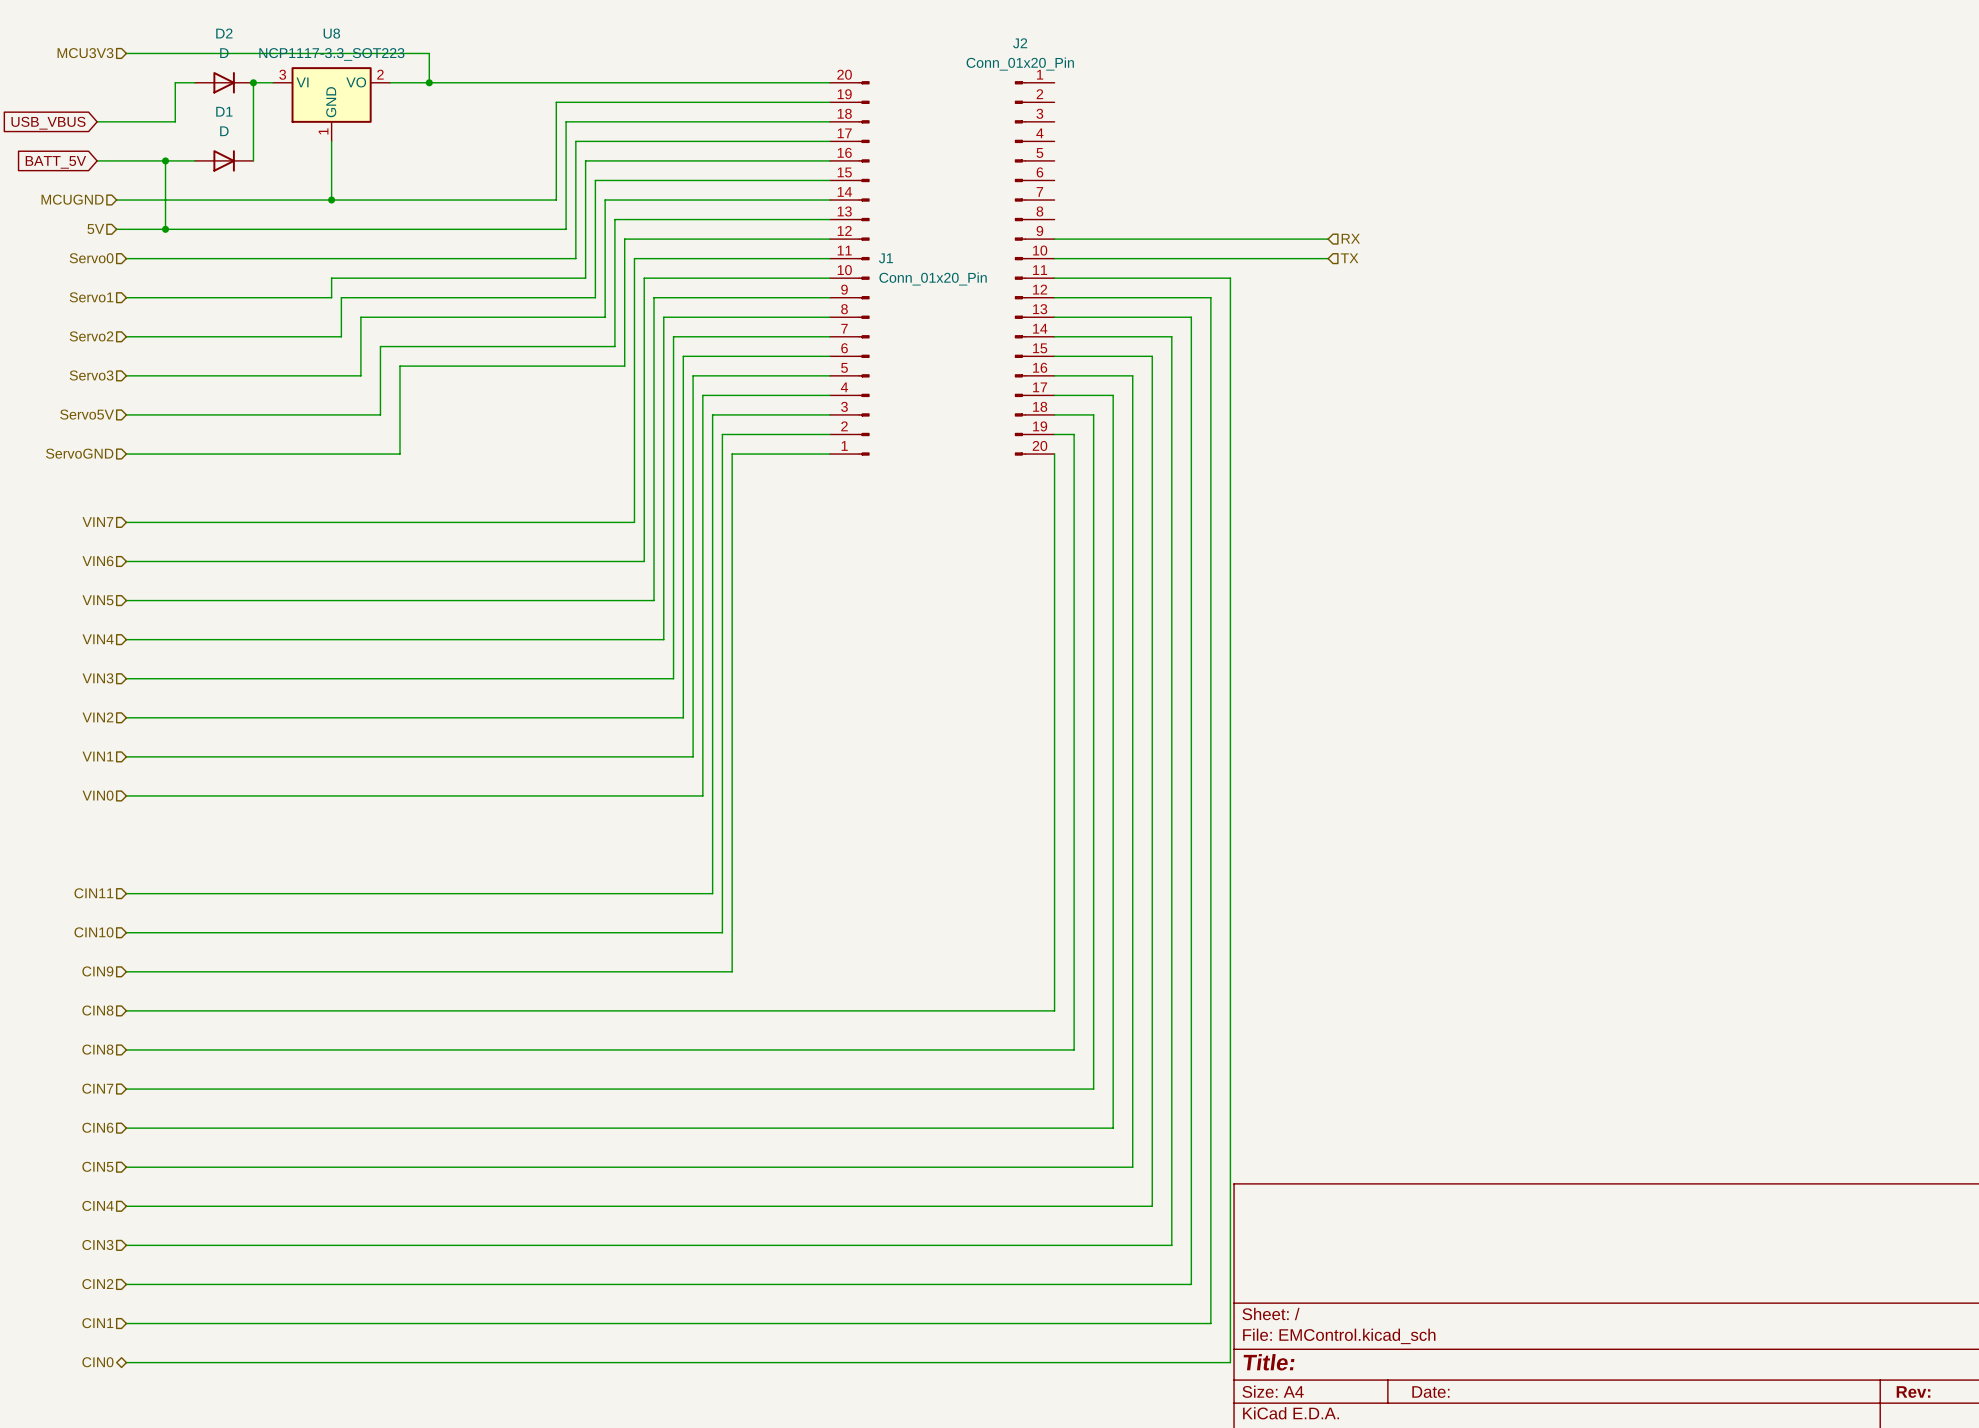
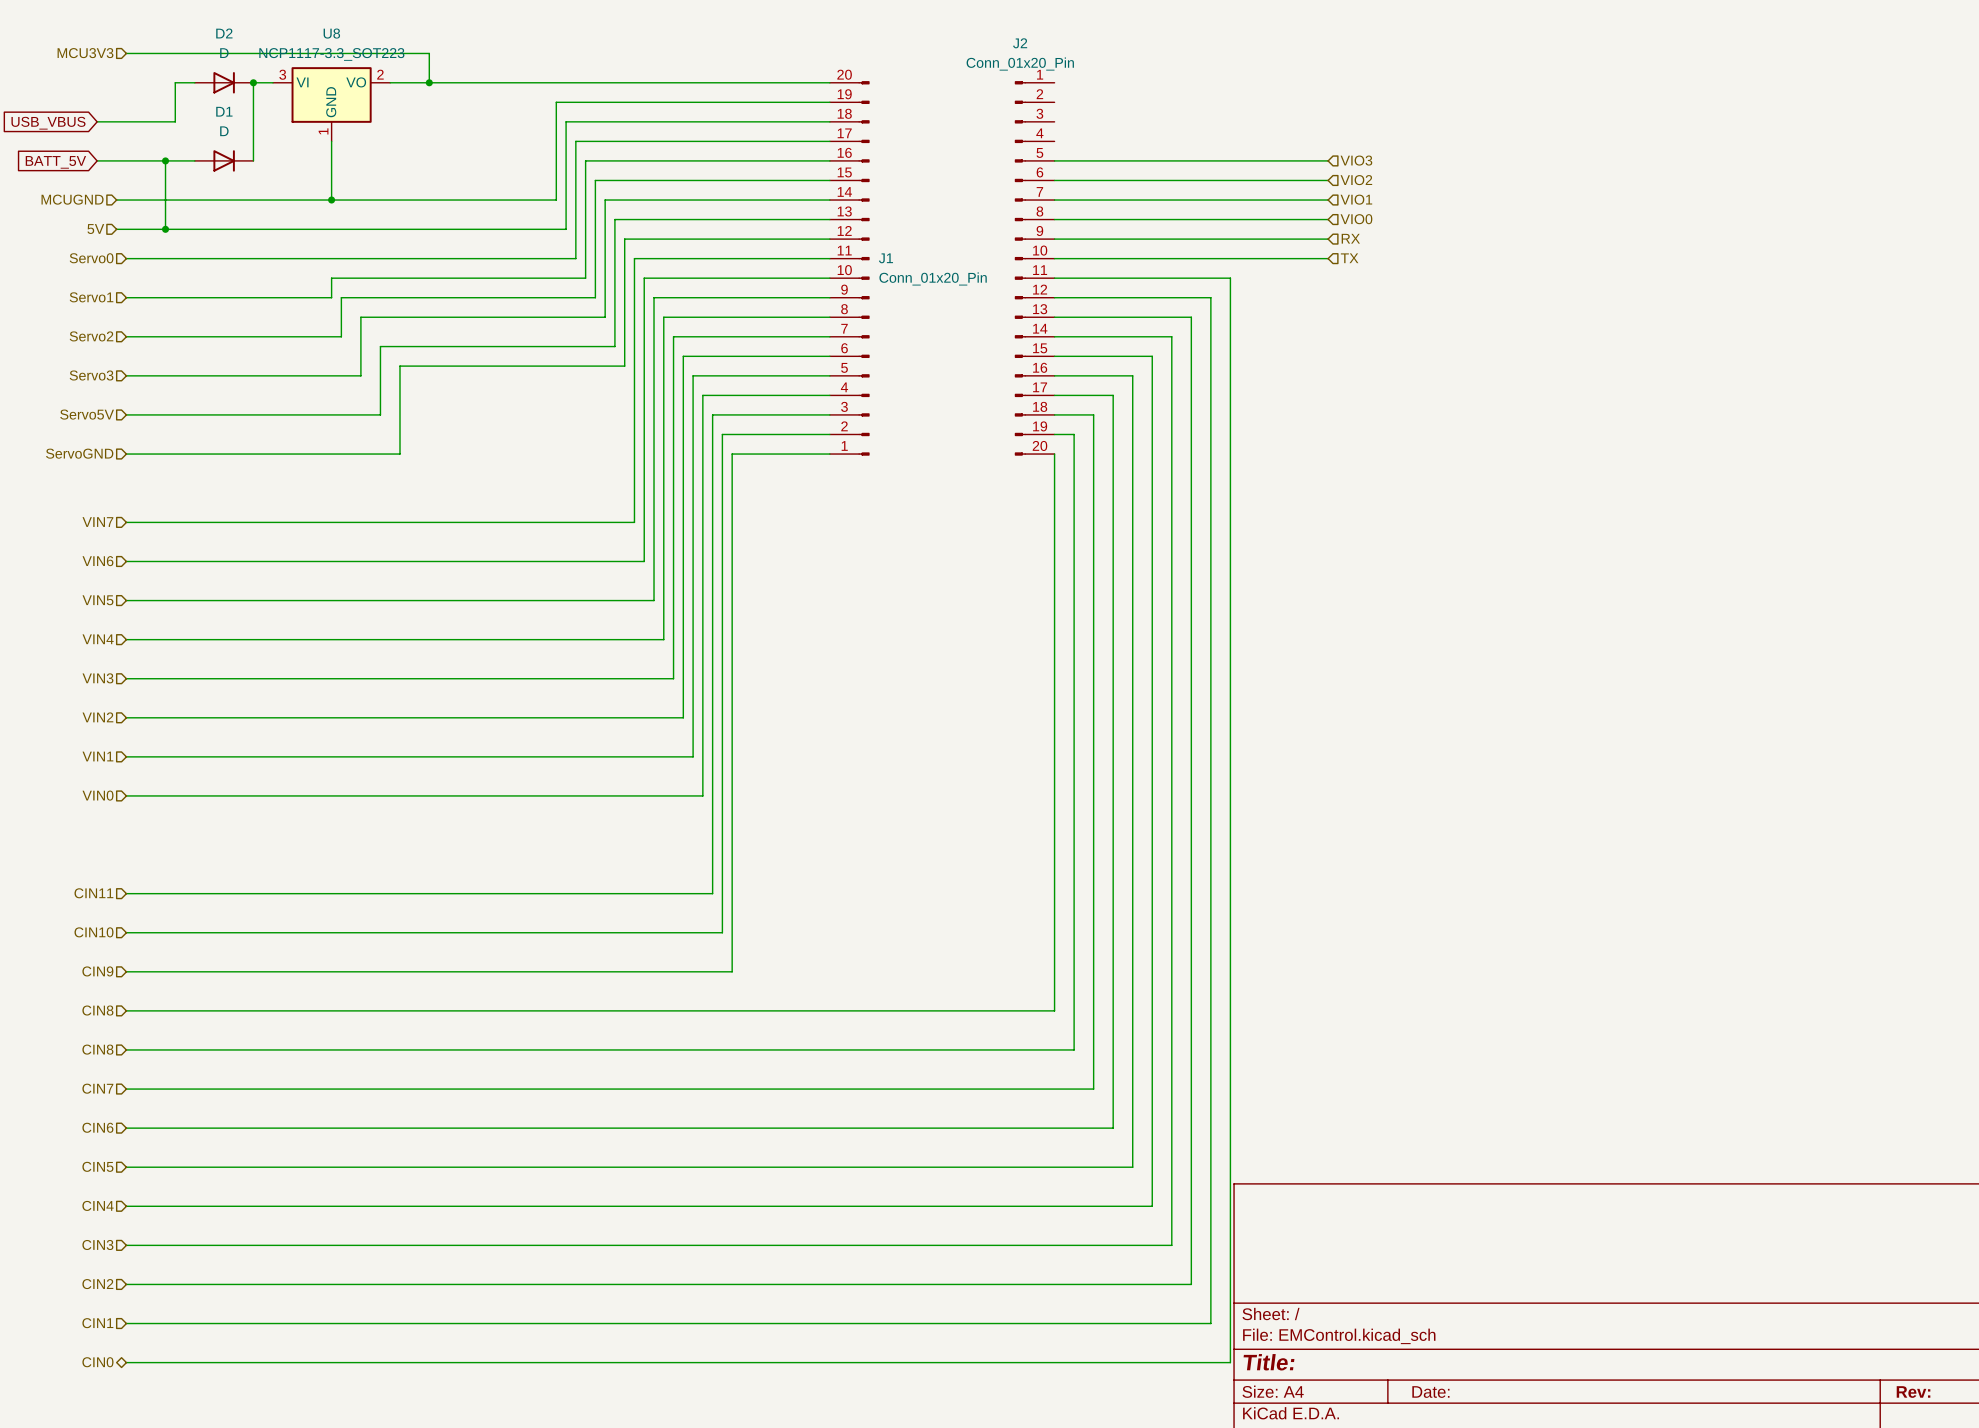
wire: none -> (1054, 160) (1328, 160)
hierarchical label: none -> VIO3 (1356, 160)
wire: none -> (1054, 180) (1328, 180)
hierarchical label: none -> VIO2 (1356, 180)
hierarchical label: none -> VIO1 (1356, 199)
wire: none -> (1054, 200) (1328, 200)
wire: none -> (1054, 219) (1328, 219)
hierarchical label: none -> VIO0 (1356, 219)

